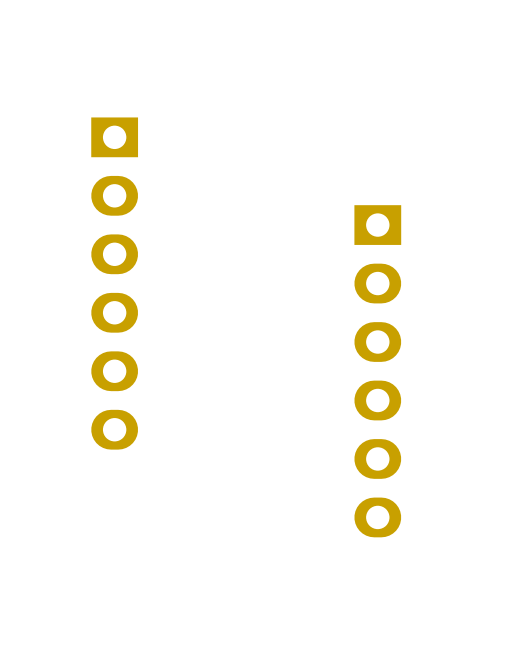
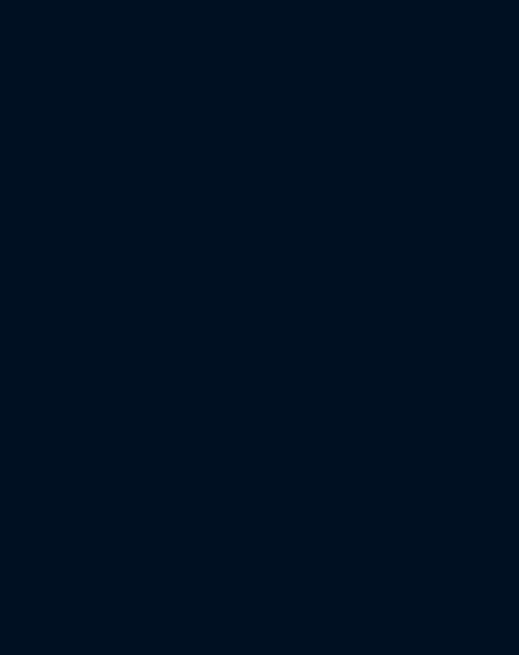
part: (114, 283) -> none
part: (377, 371) -> none

